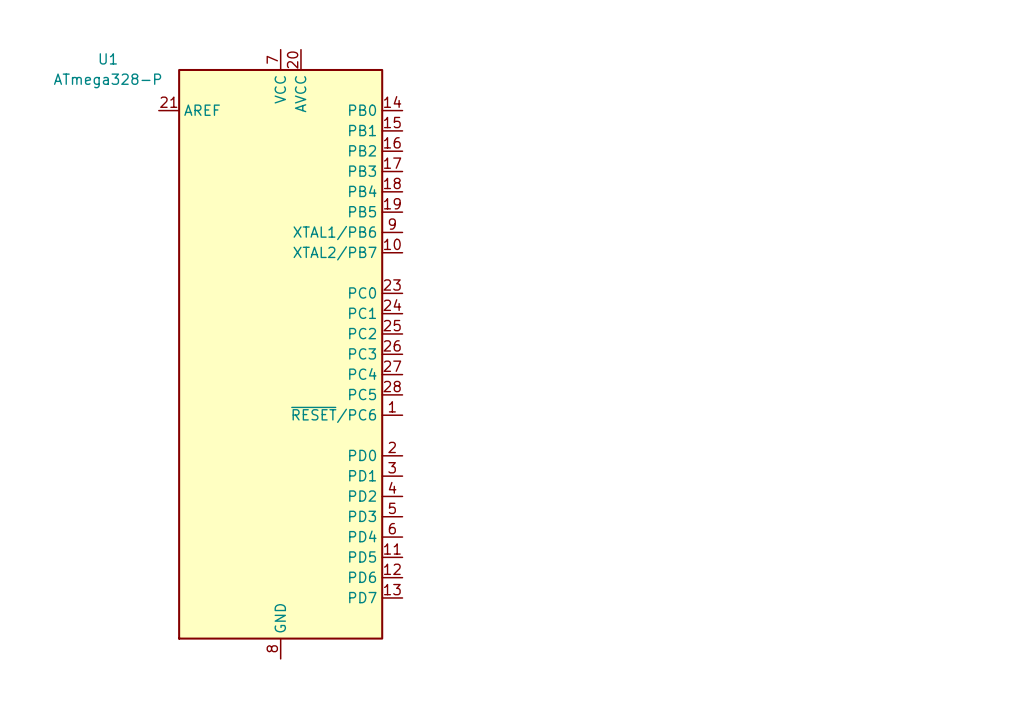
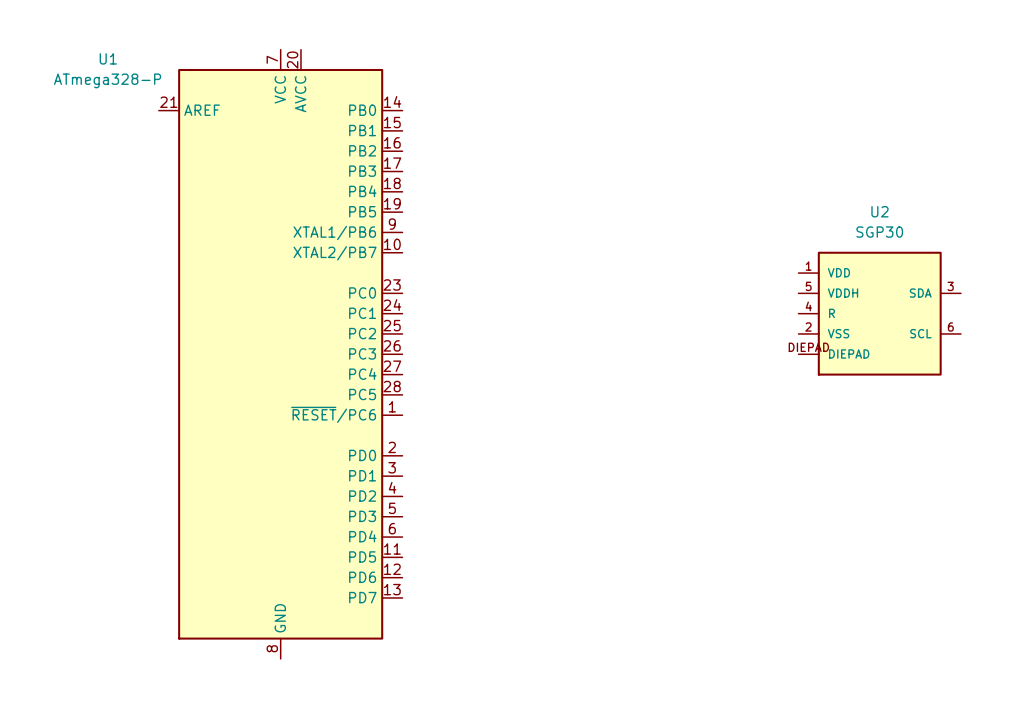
U2: none -> SGP30 (879, 313)

